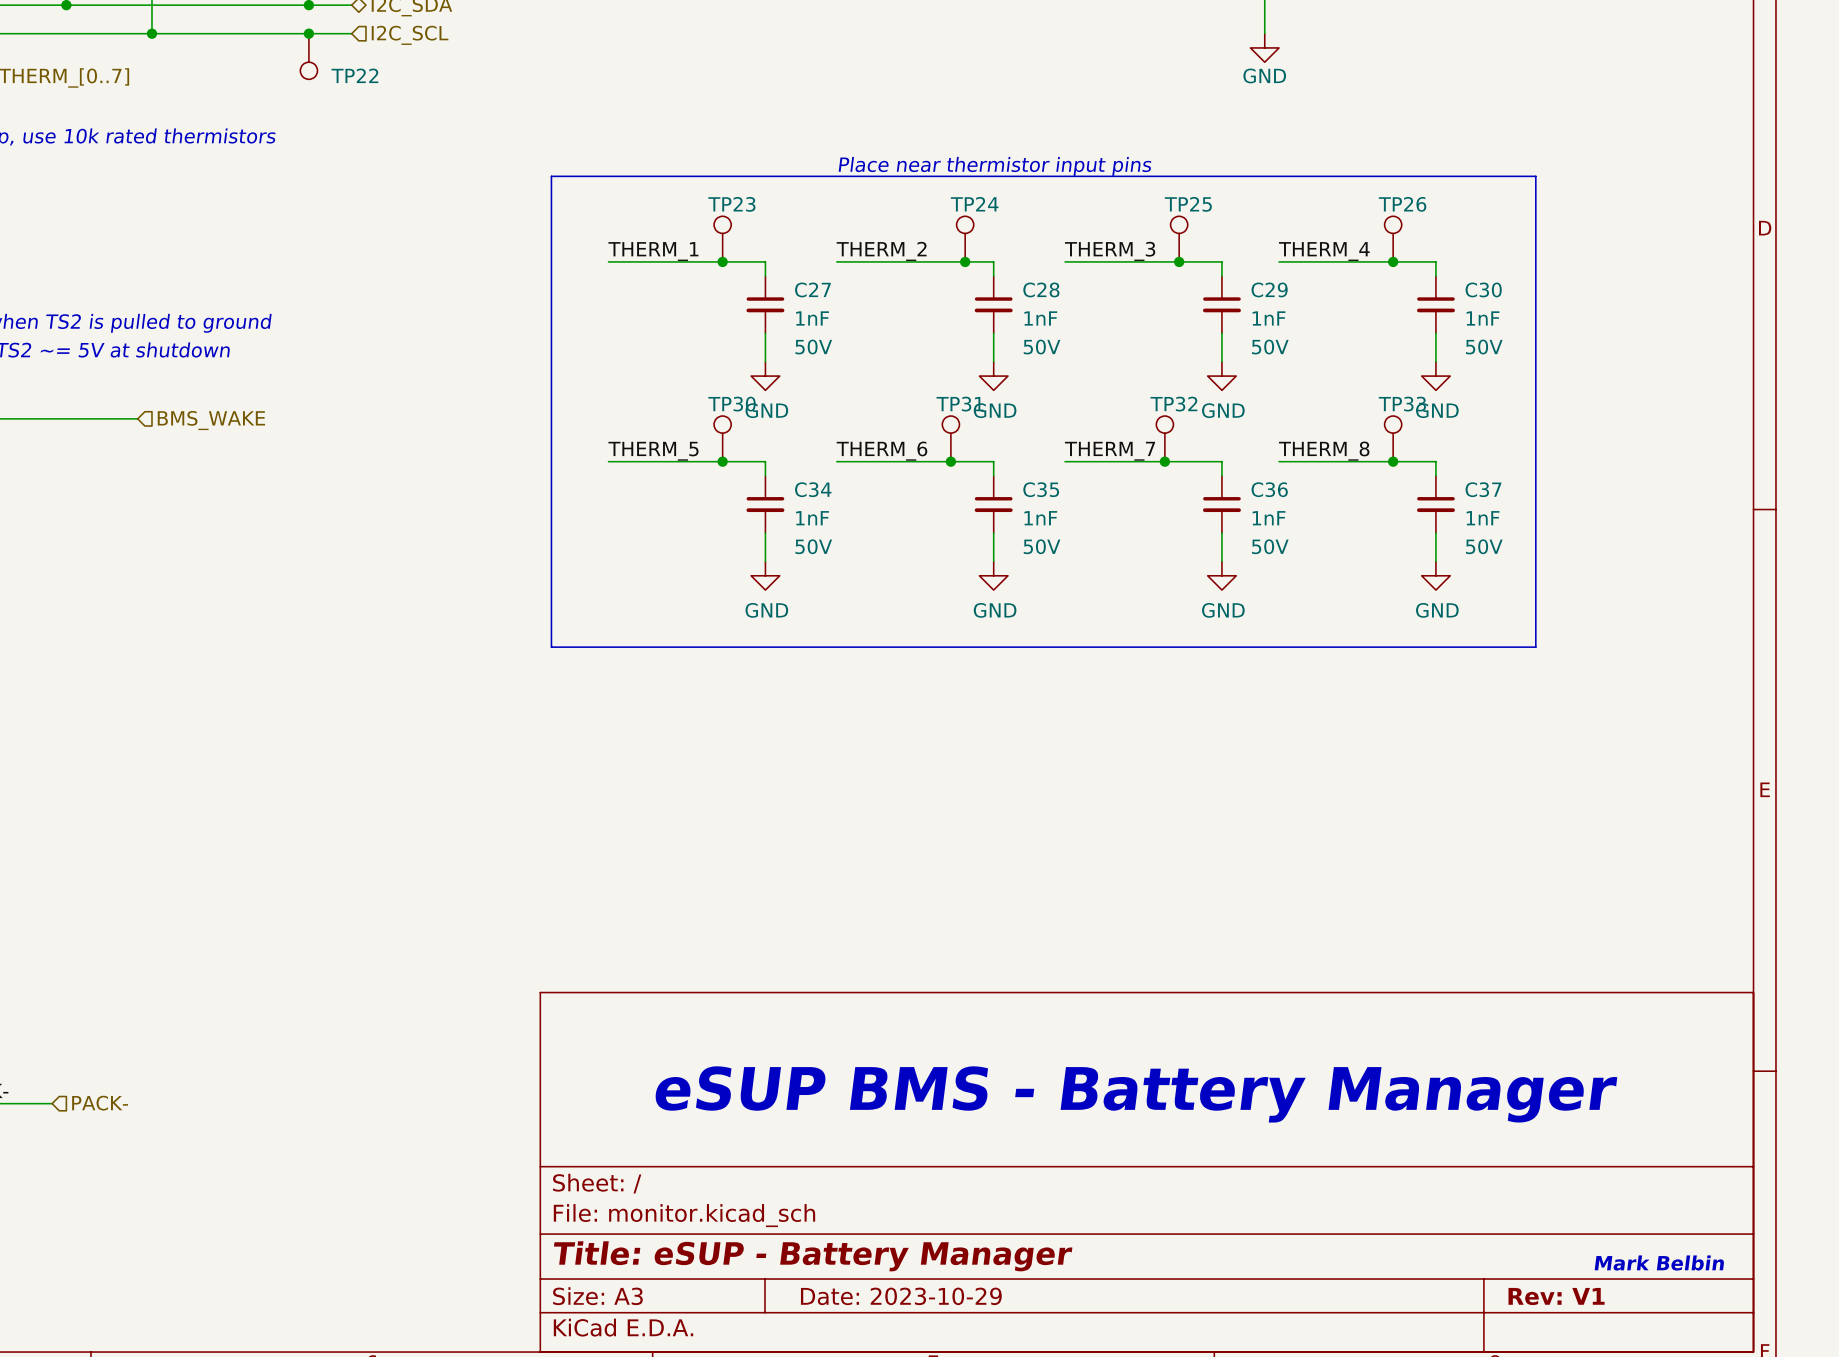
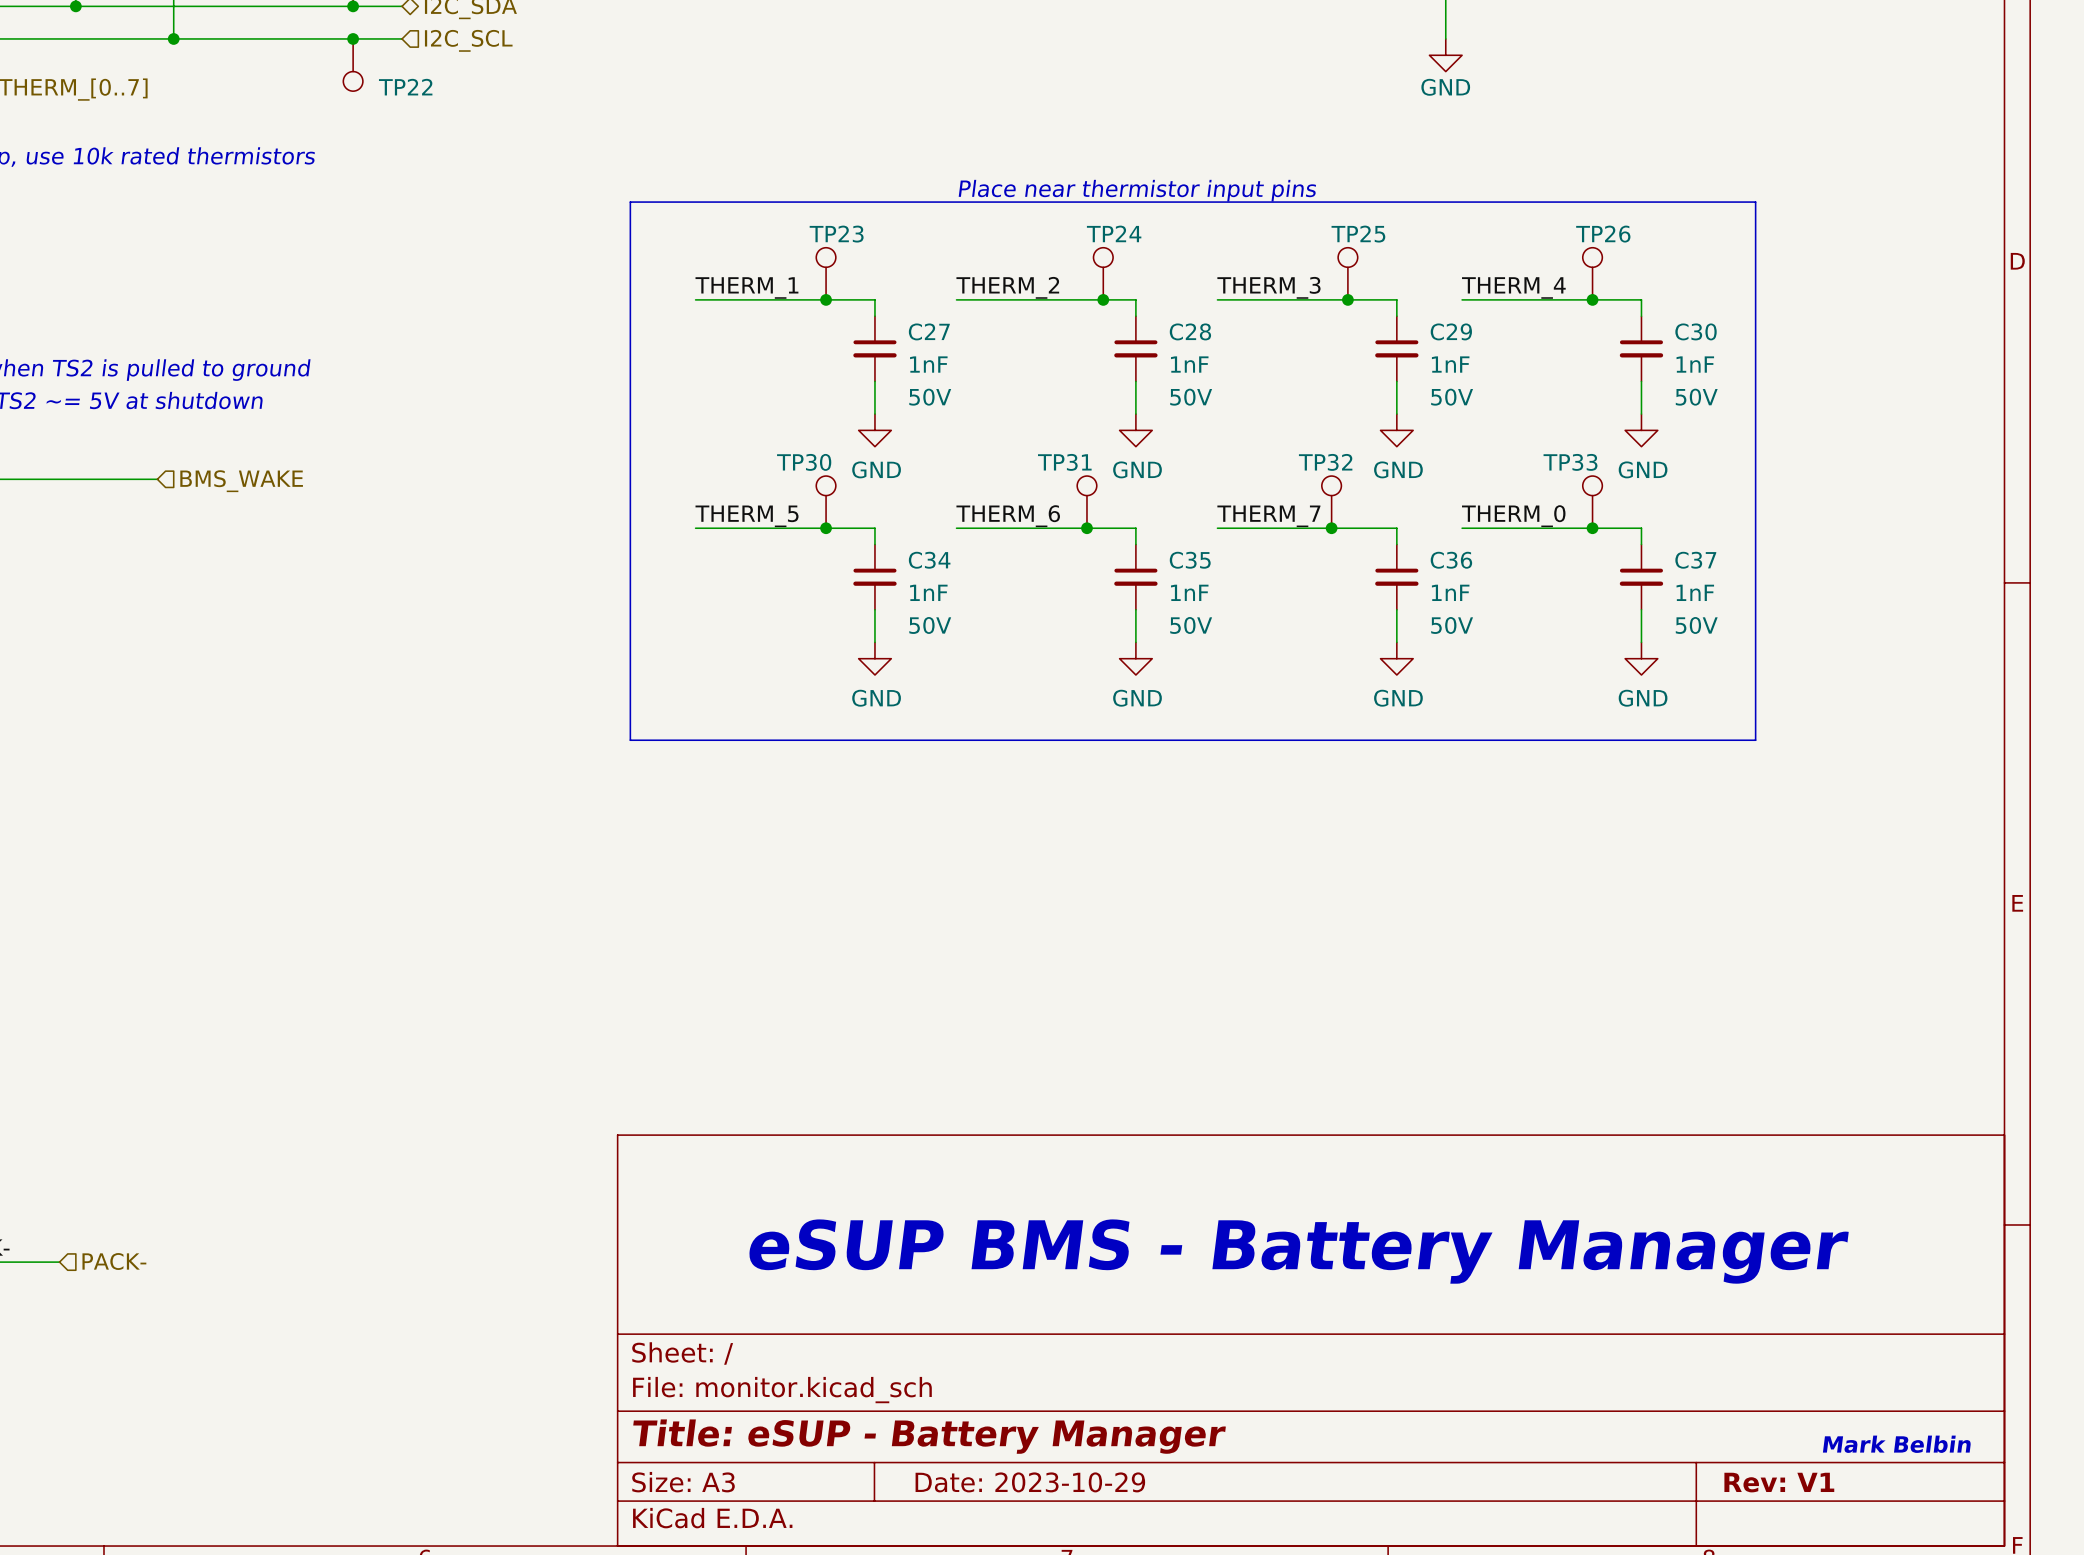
TP30 name position: TP30 (732, 404) -> TP30 (804, 462)
TP31 name position: TP31 (960, 404) -> TP31 (1064, 462)
TP32 name position: TP32 (1173, 404) -> TP32 (1325, 462)
TP33 name position: TP33 (1402, 404) -> TP33 (1570, 462)
label: THERM_8 (1324, 451) -> THERM_0 (1513, 516)

